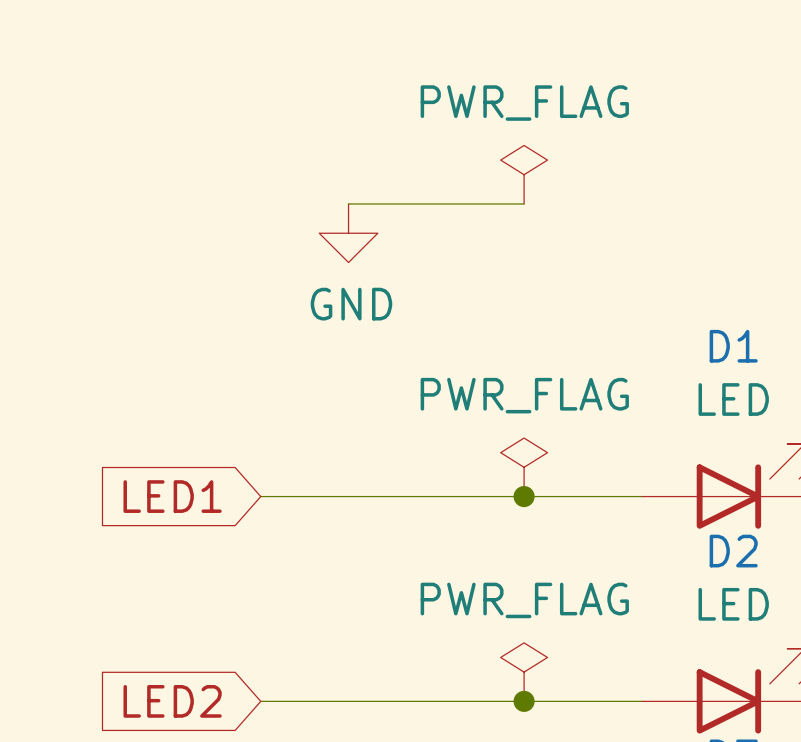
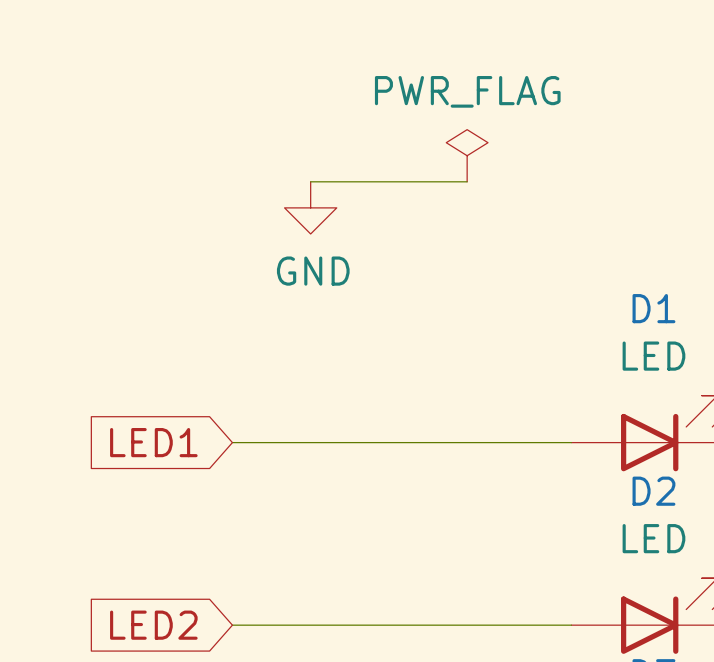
power symbol: PWR_FLAG (524, 467) -> none
junction: (524, 496) -> none
power symbol: PWR_FLAG (524, 672) -> none
junction: (524, 701) -> none

